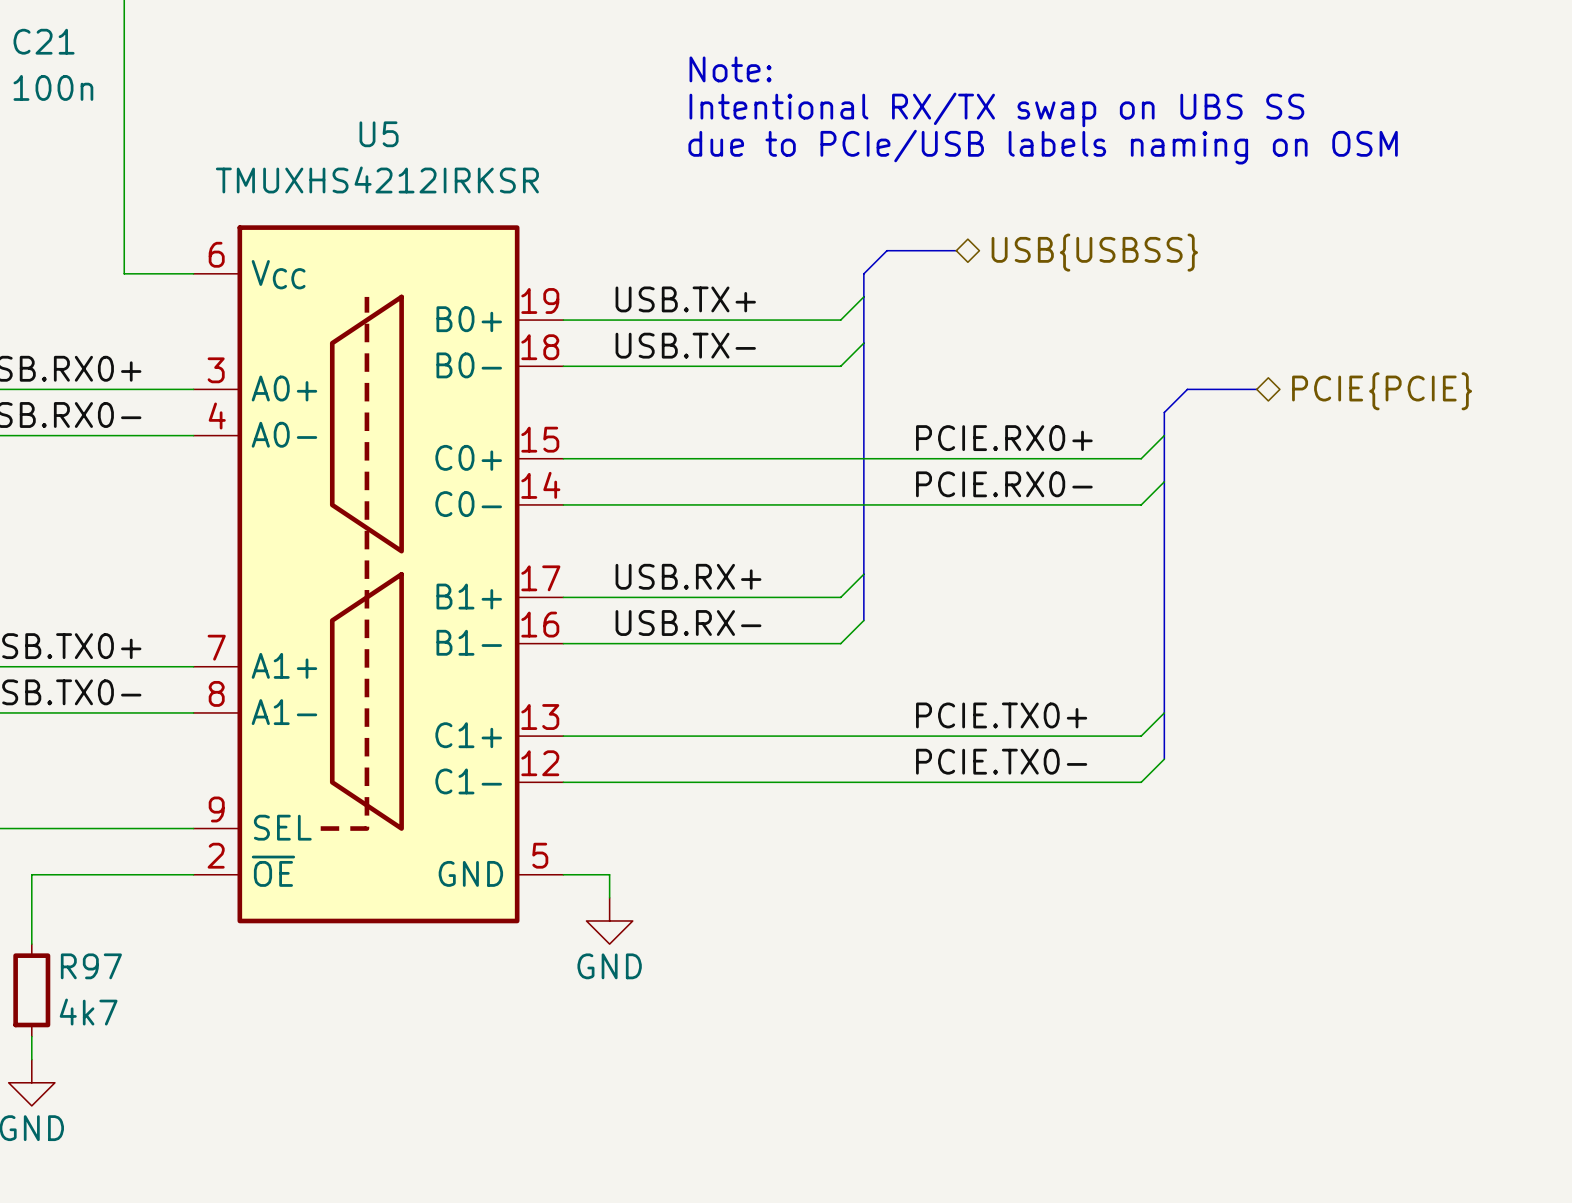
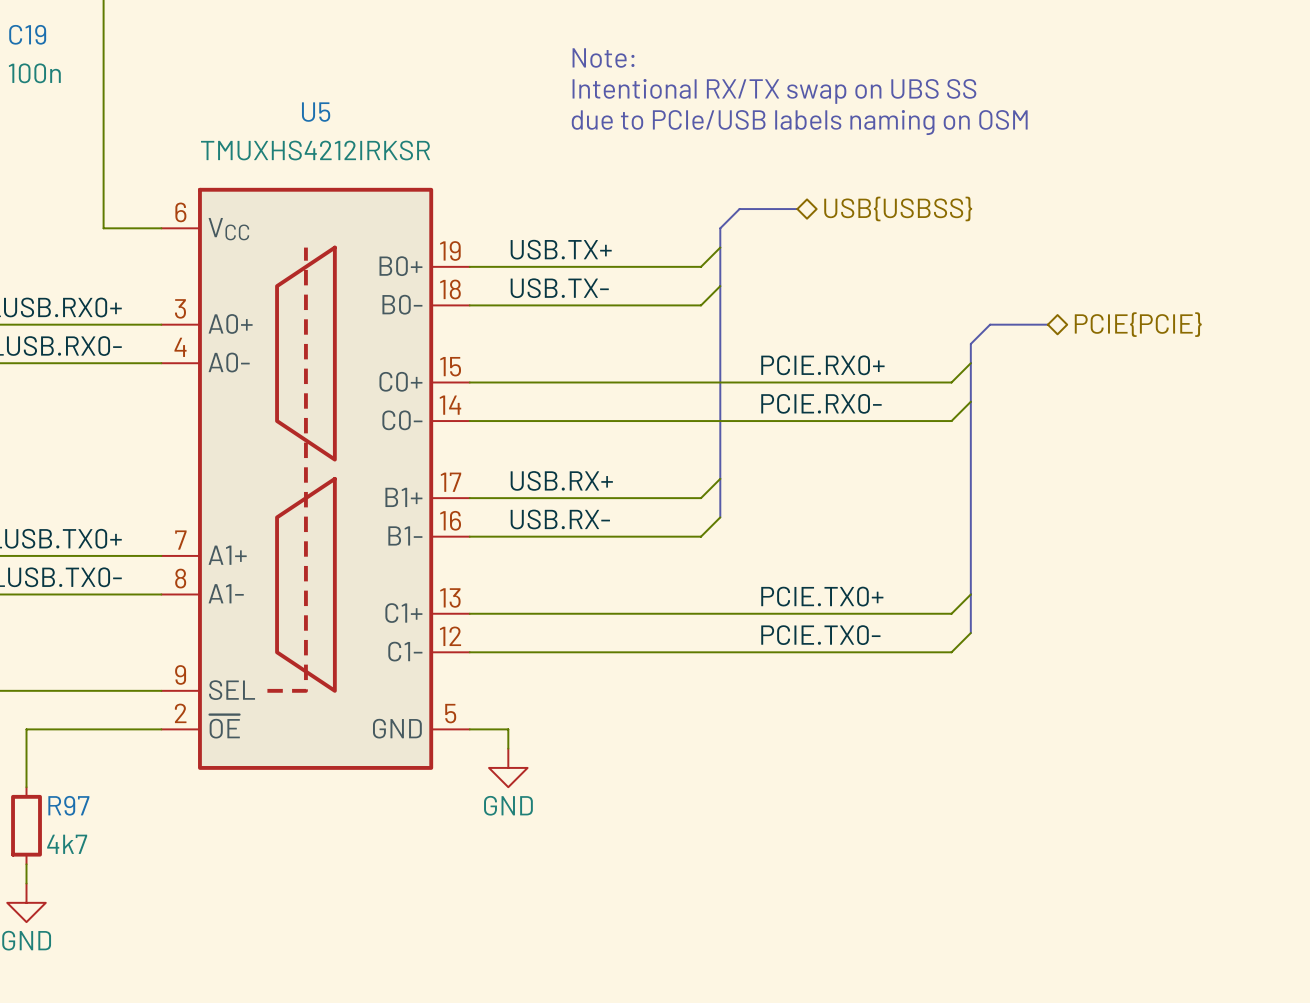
C21 name: C21 (44, 41) -> C19 (27, 34)

